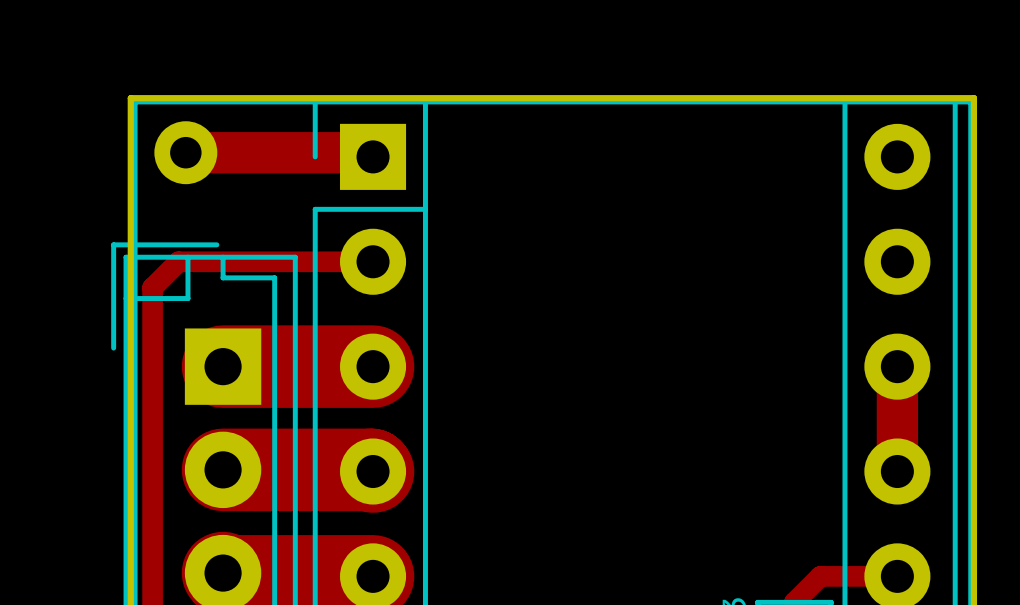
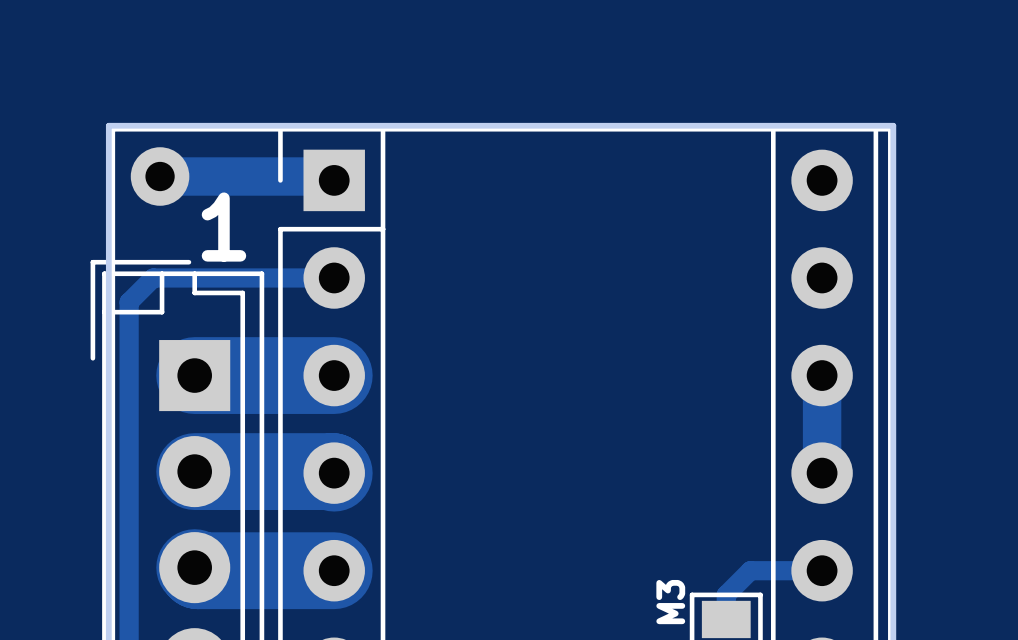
text: none -> 1 (223, 227)

